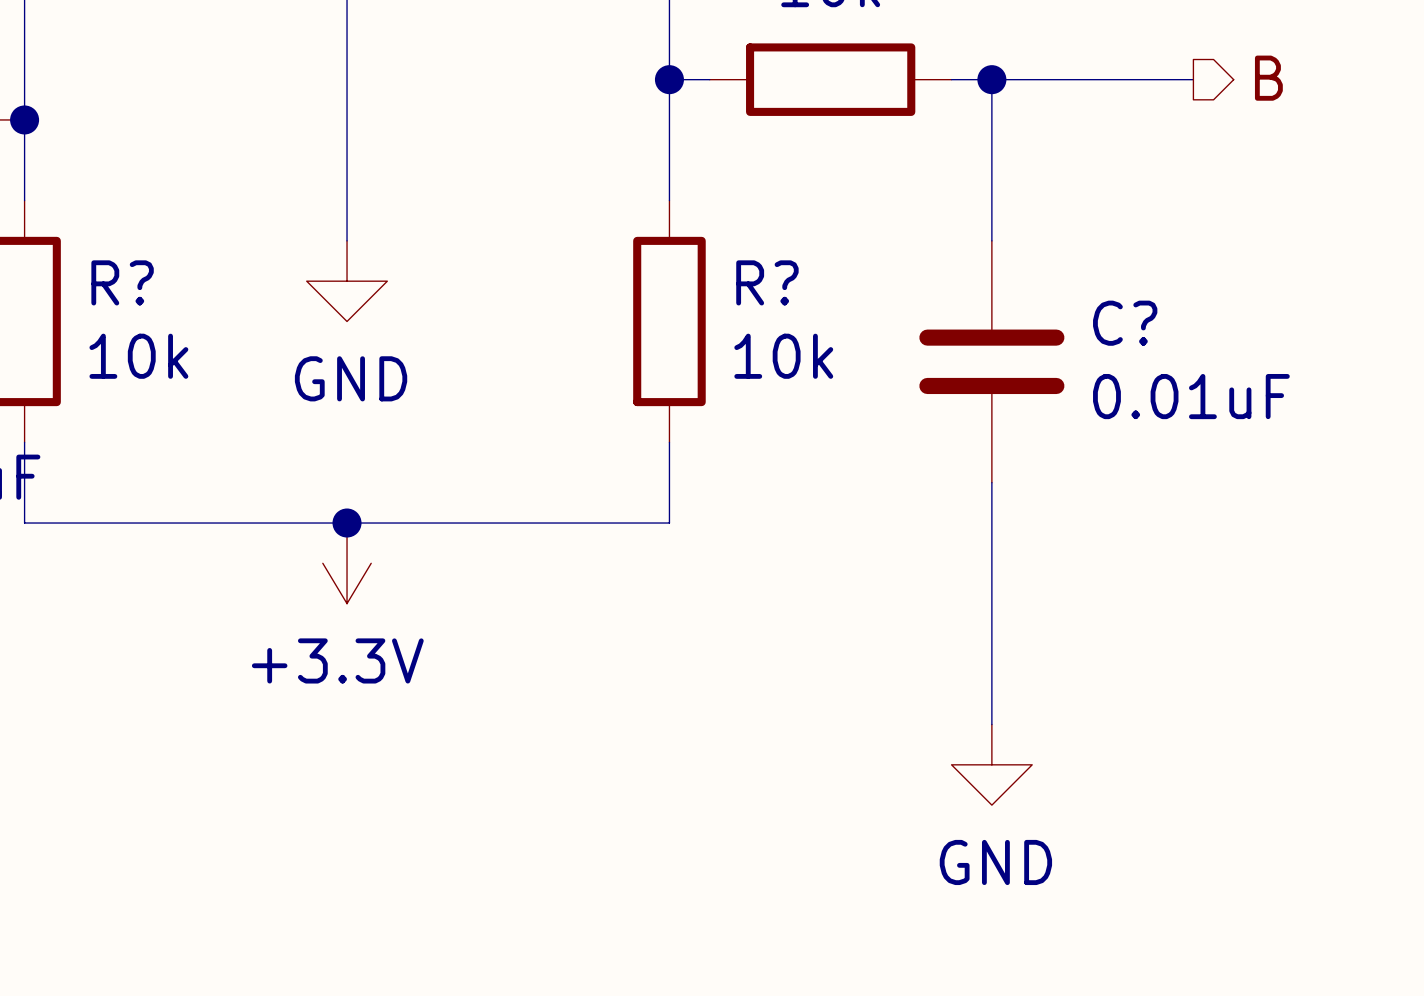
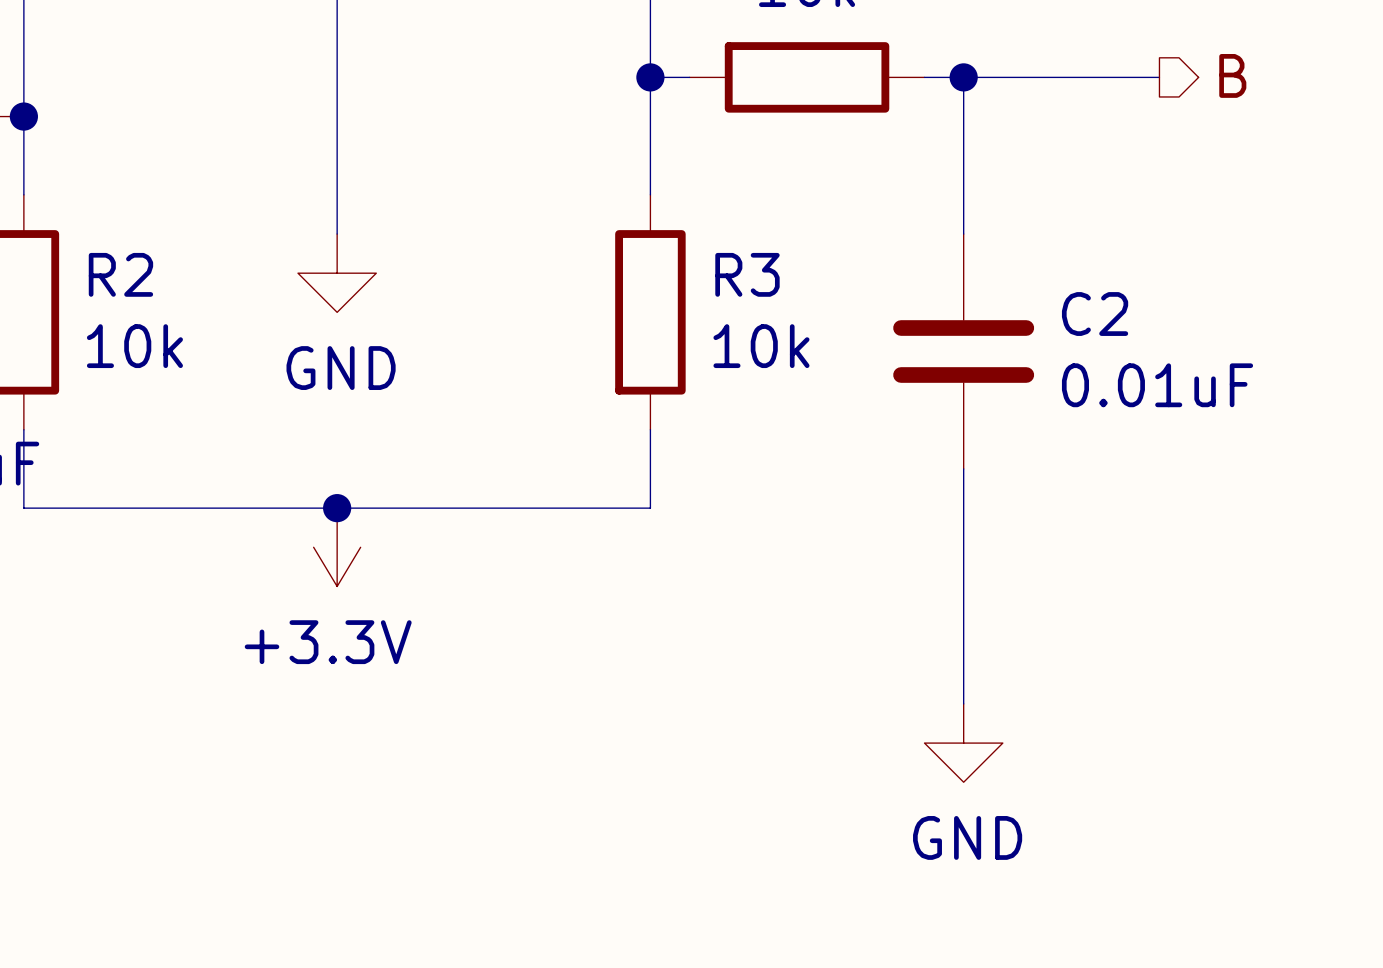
R? name: R? (122, 282) -> R2 (120, 274)
R? name: R? (767, 282) -> R3 (747, 274)
C? name: C? (1125, 323) -> C2 (1095, 314)

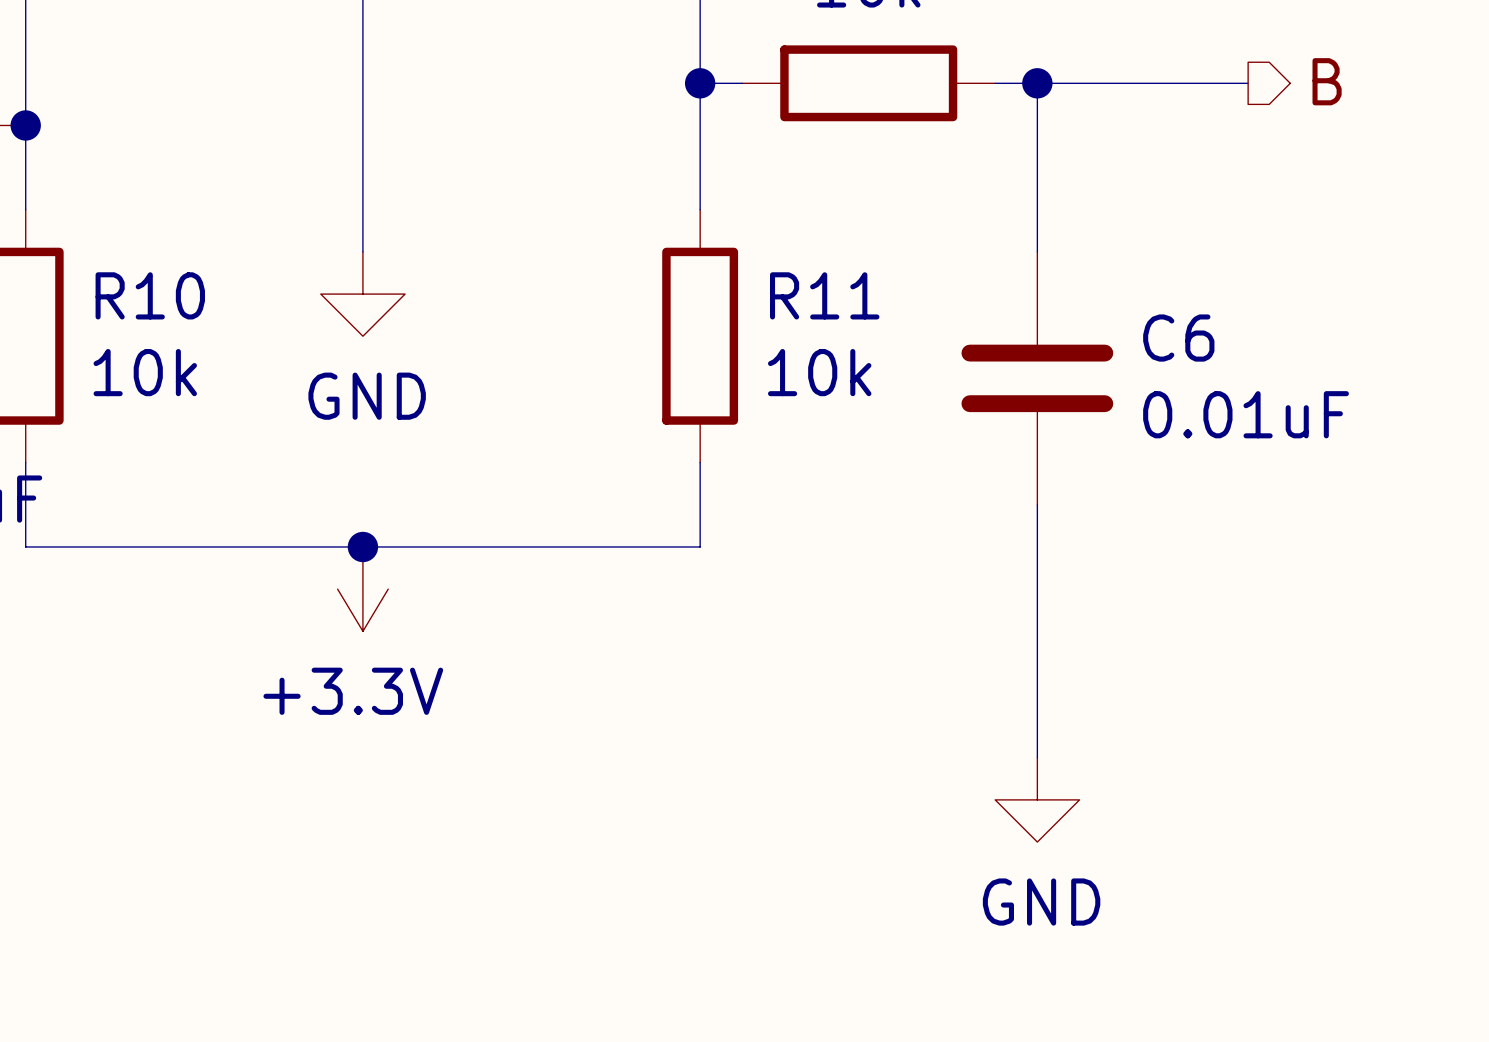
R2 name: R2 (120, 274) -> R10 (150, 295)
R3 name: R3 (747, 274) -> R11 (824, 295)
C2 name: C2 (1095, 314) -> C6 (1178, 338)

